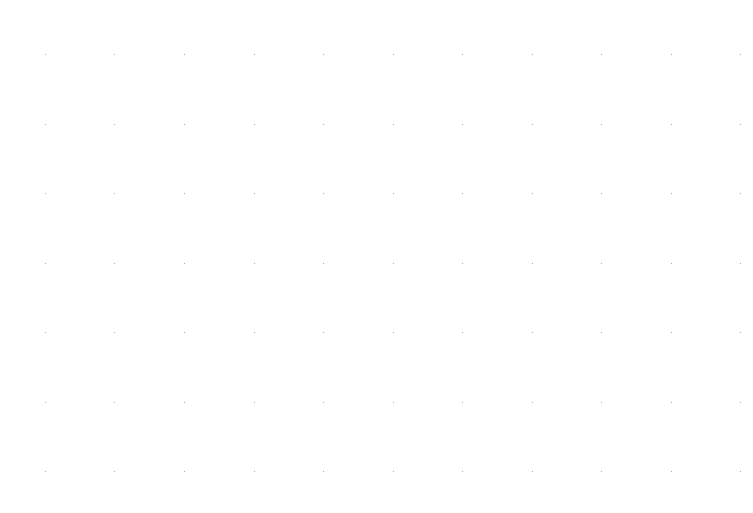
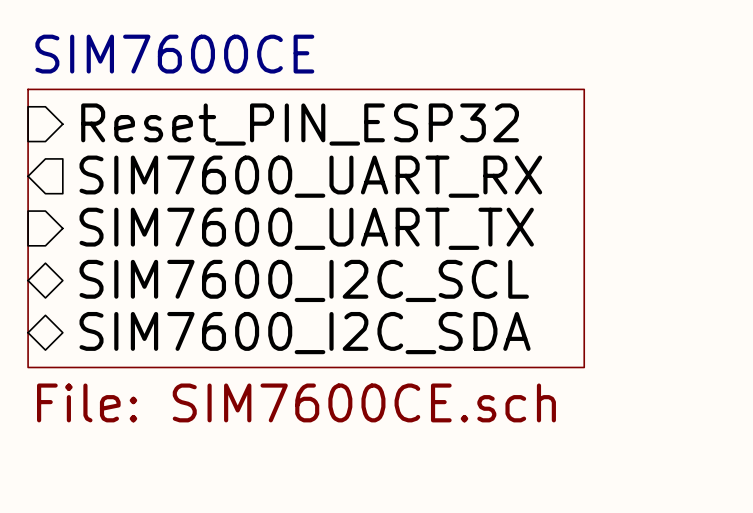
sheet pin: none -> Reset_PIN_ESP32 (300, 124)
sheet pin: none -> SIM7600_UART_RX (310, 176)
sheet SIM7600CE: none -> File: SIM7600CE.sch (306, 228)
sheet pin: none -> SIM7600_UART_TX (306, 228)
sheet pin: none -> SIM7600_I2C_SCL (304, 280)
sheet pin: none -> SIM7600_I2C_SDA (305, 333)

